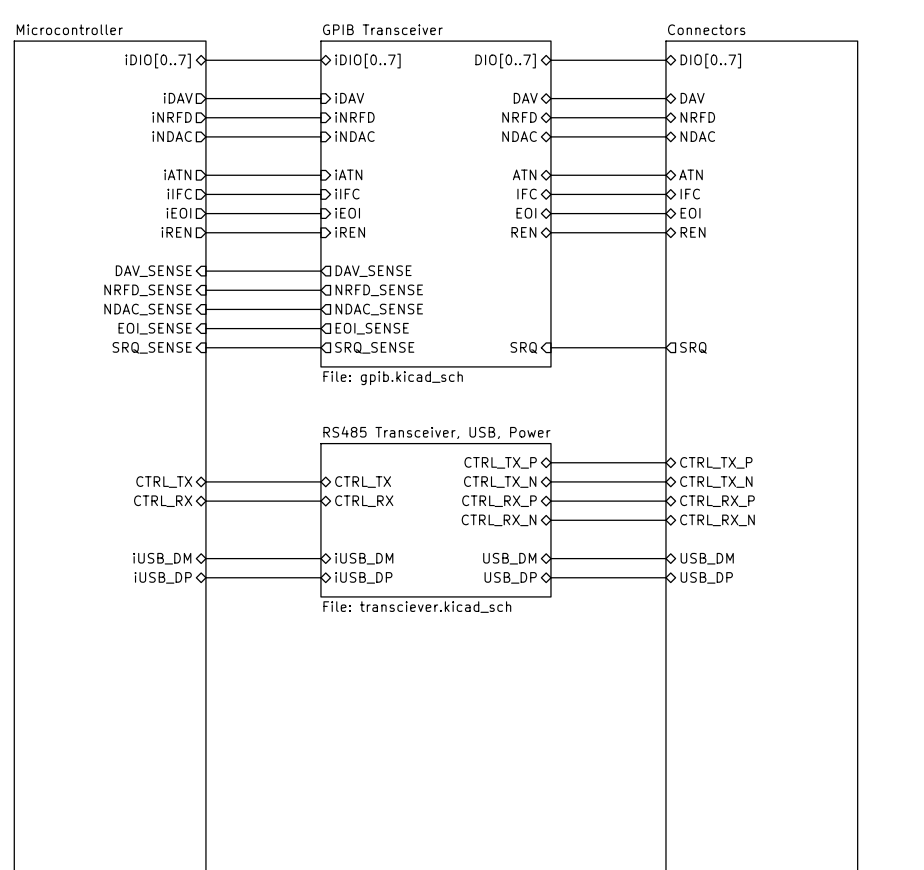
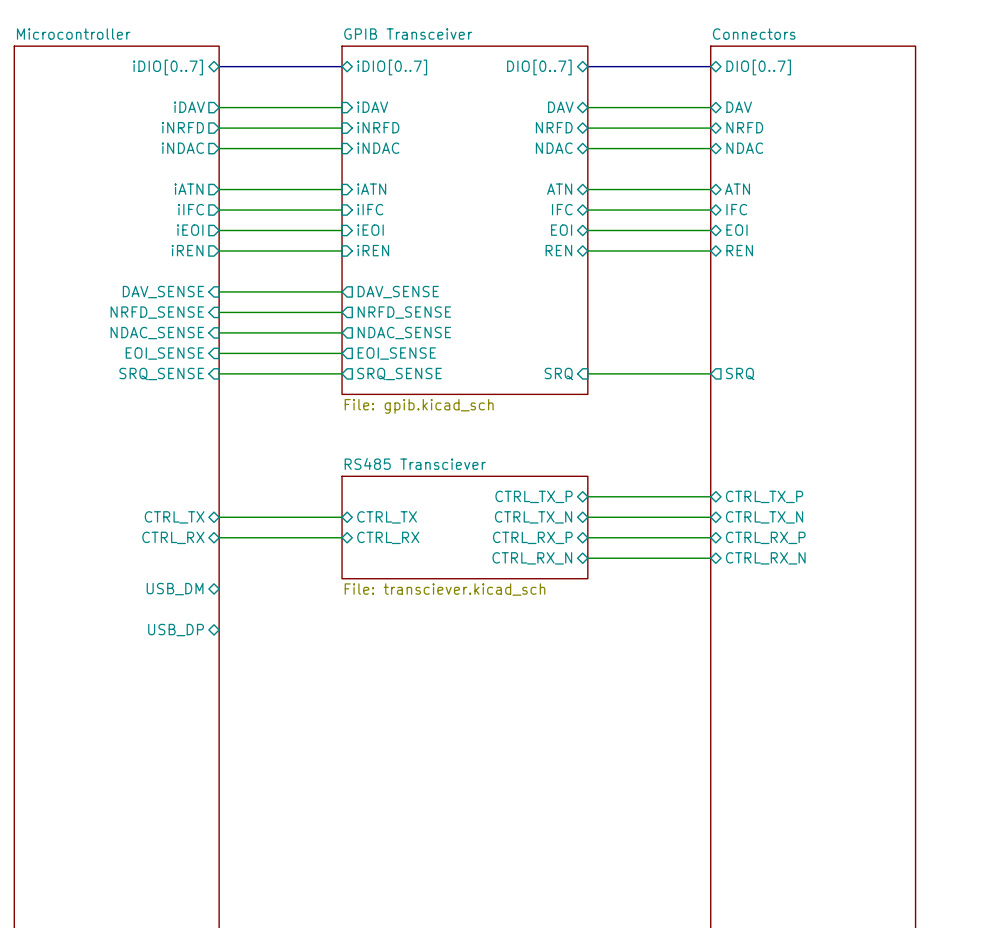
sheet RS485 Transciever: none -> File: transciever.kicad_sch (464, 527)
sheet RS485 Transceiver, USB, Power: File: transciever.kicad_sch (435, 520) -> none
sheet pin: iUSB_DM (162, 558) -> USB_DM (175, 589)
wire: (205, 558) (320, 558) -> none
sheet pin: iUSB_DM (364, 558) -> none
sheet pin: USB_DM (509, 558) -> none
wire: (550, 558) (665, 558) -> none
sheet pin: USB_DM (707, 558) -> none
sheet pin: iUSB_DP (163, 577) -> USB_DP (176, 630)
wire: (205, 577) (320, 577) -> none
sheet pin: iUSB_DP (363, 577) -> none
sheet pin: USB_DP (510, 577) -> none
wire: (550, 577) (665, 577) -> none
sheet pin: USB_DP (706, 577) -> none

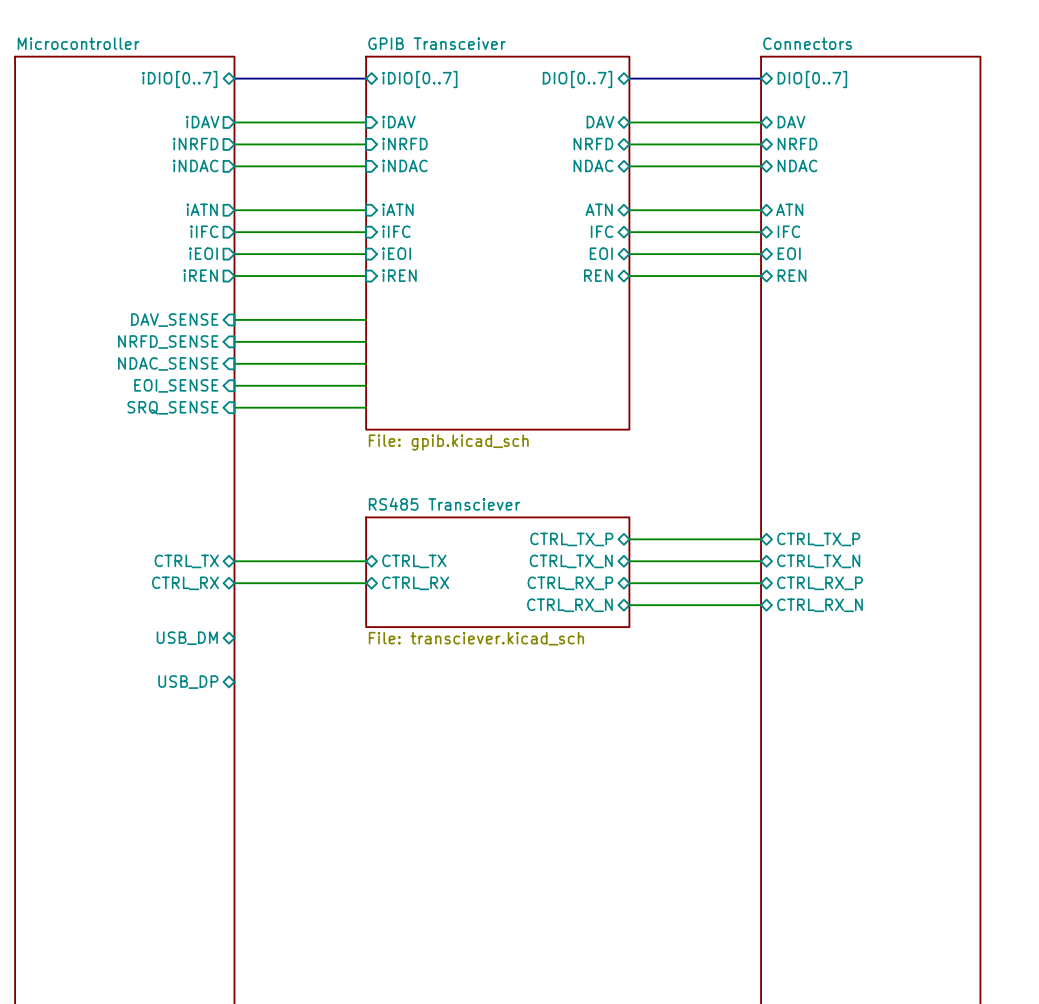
sheet pin: DAV_SENSE (398, 292) -> none
sheet pin: NRFD_SENSE (404, 312) -> none
sheet pin: NDAC_SENSE (404, 333) -> none
sheet pin: EOI_SENSE (396, 353) -> none
sheet pin: SRQ_SENSE (399, 373) -> none
sheet pin: SRQ (558, 373) -> none
wire: (587, 373) (710, 373) -> none
sheet pin: SRQ (740, 373) -> none

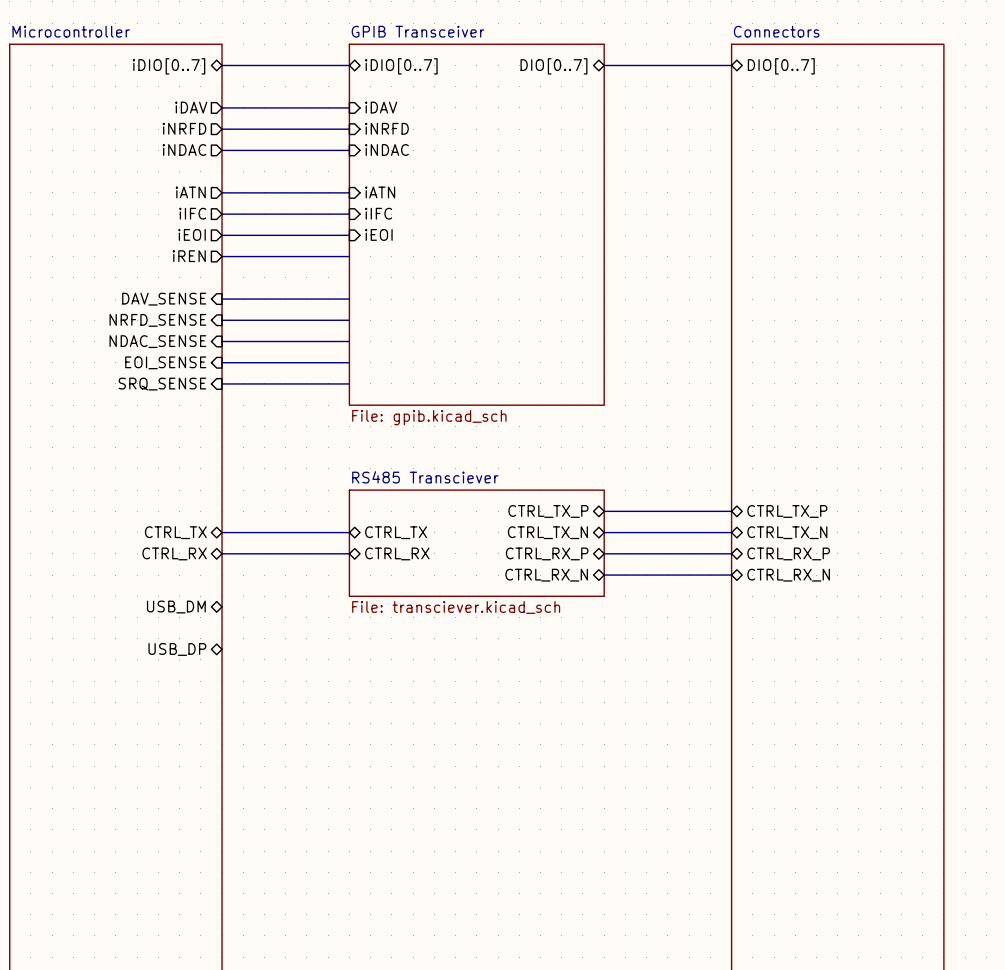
sheet pin: DAV (600, 122) -> none
wire: (629, 122) (761, 122) -> none
sheet pin: DAV (791, 122) -> none
sheet pin: NRFD (593, 144) -> none
wire: (629, 144) (761, 144) -> none
sheet pin: NRFD (797, 144) -> none
sheet pin: NDAC (593, 165) -> none
sheet pin: NDAC (797, 165) -> none
wire: (629, 166) (761, 166) -> none
sheet pin: ATN (599, 209) -> none
sheet pin: ATN (789, 209) -> none
wire: (629, 210) (761, 210) -> none
sheet pin: IFC (602, 231) -> none
sheet pin: IFC (788, 231) -> none
wire: (629, 232) (761, 232) -> none
sheet pin: EOI (601, 253) -> none
sheet pin: EOI (789, 253) -> none
wire: (629, 254) (761, 254) -> none
sheet pin: iREN (399, 275) -> none
sheet pin: REN (598, 275) -> none
sheet pin: REN (792, 275) -> none
wire: (629, 276) (761, 276) -> none

